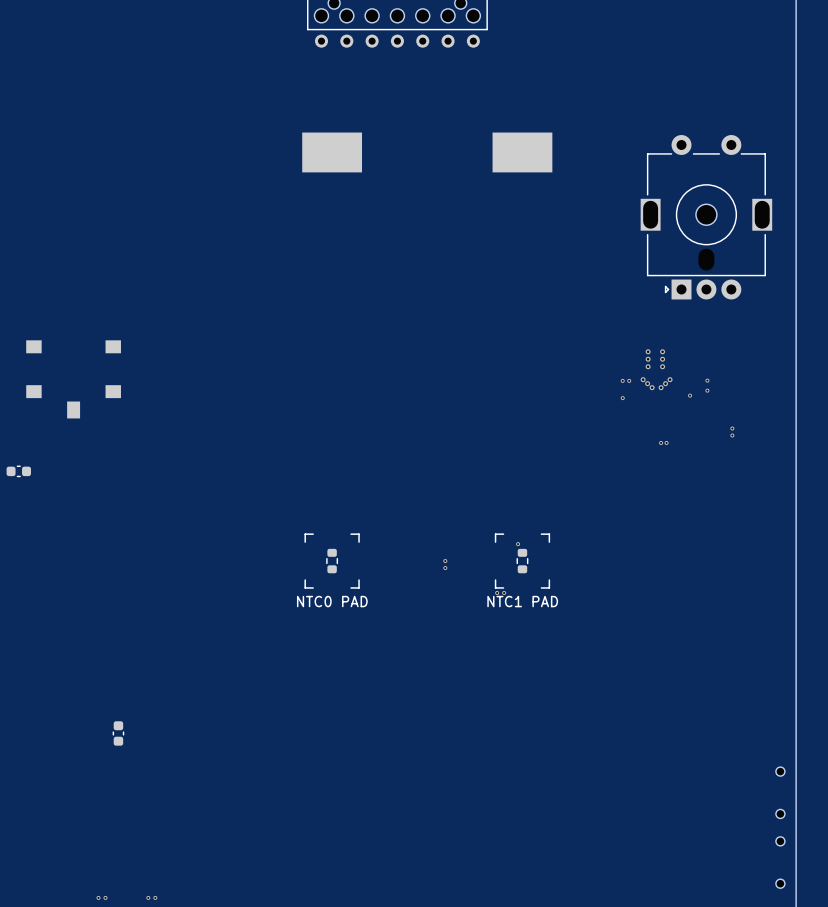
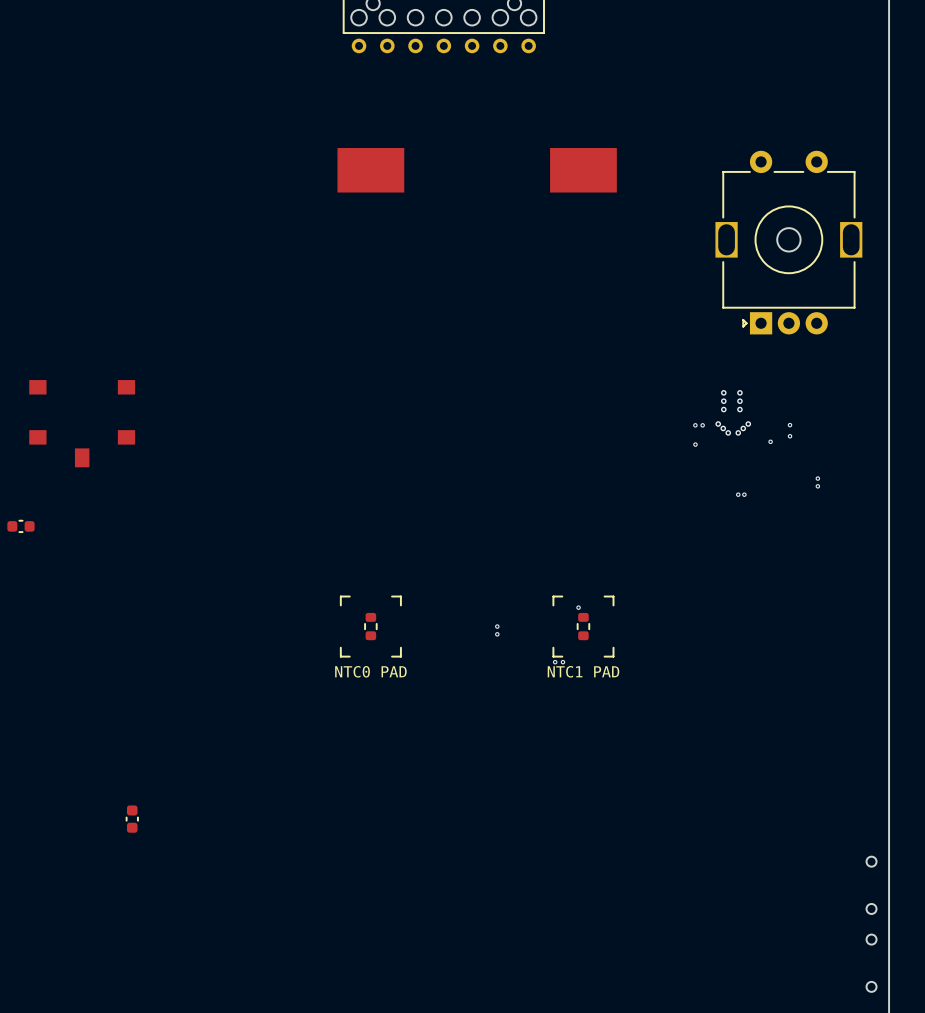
via: (98, 897) -> none
via: (105, 897) -> none
via: (148, 897) -> none
via: (155, 897) -> none

